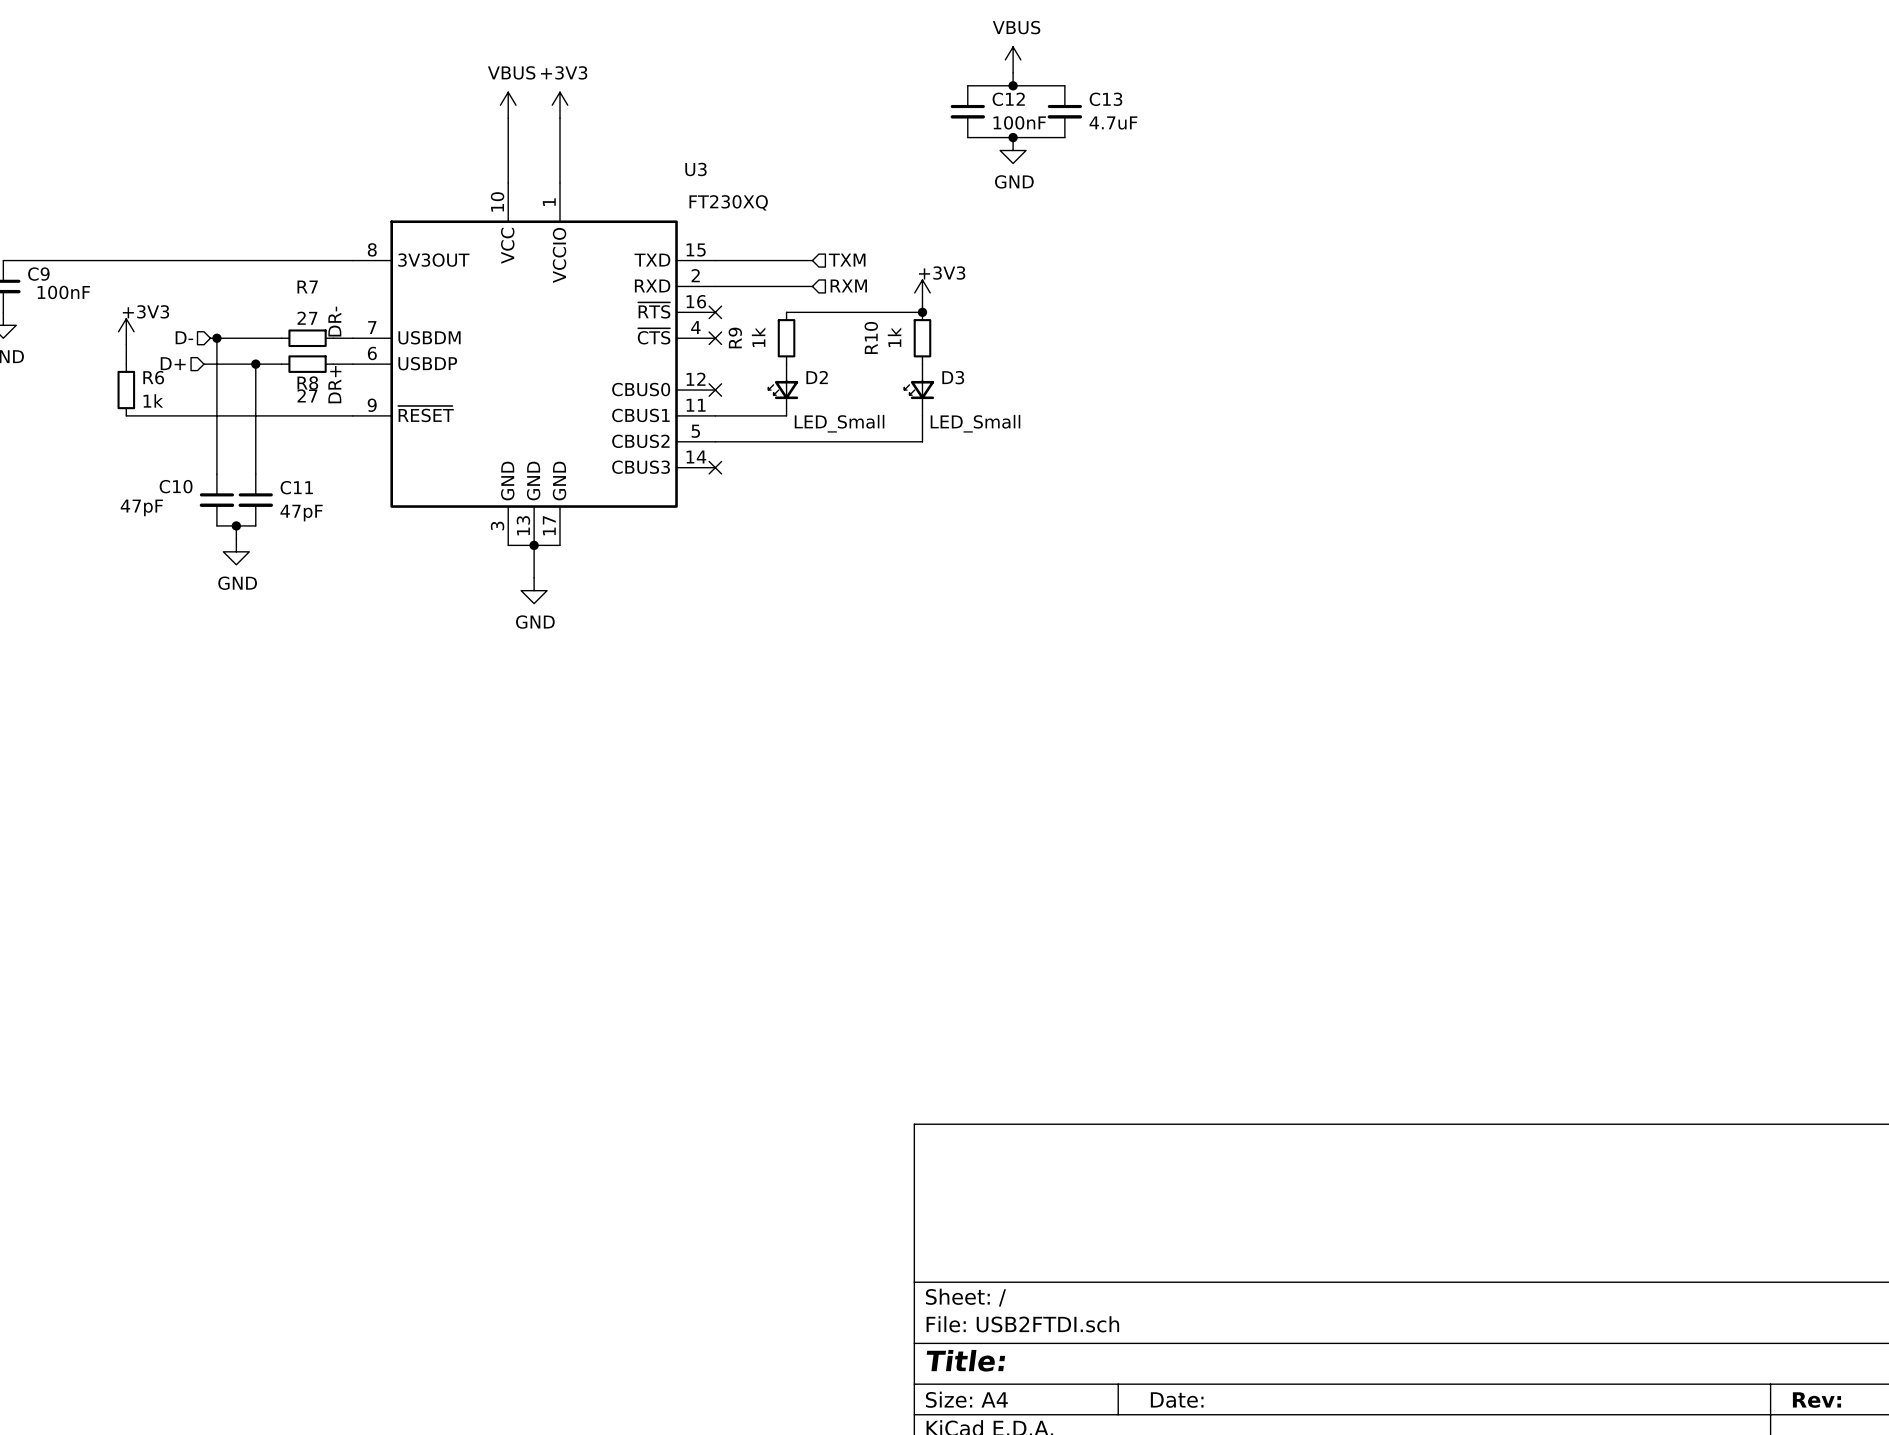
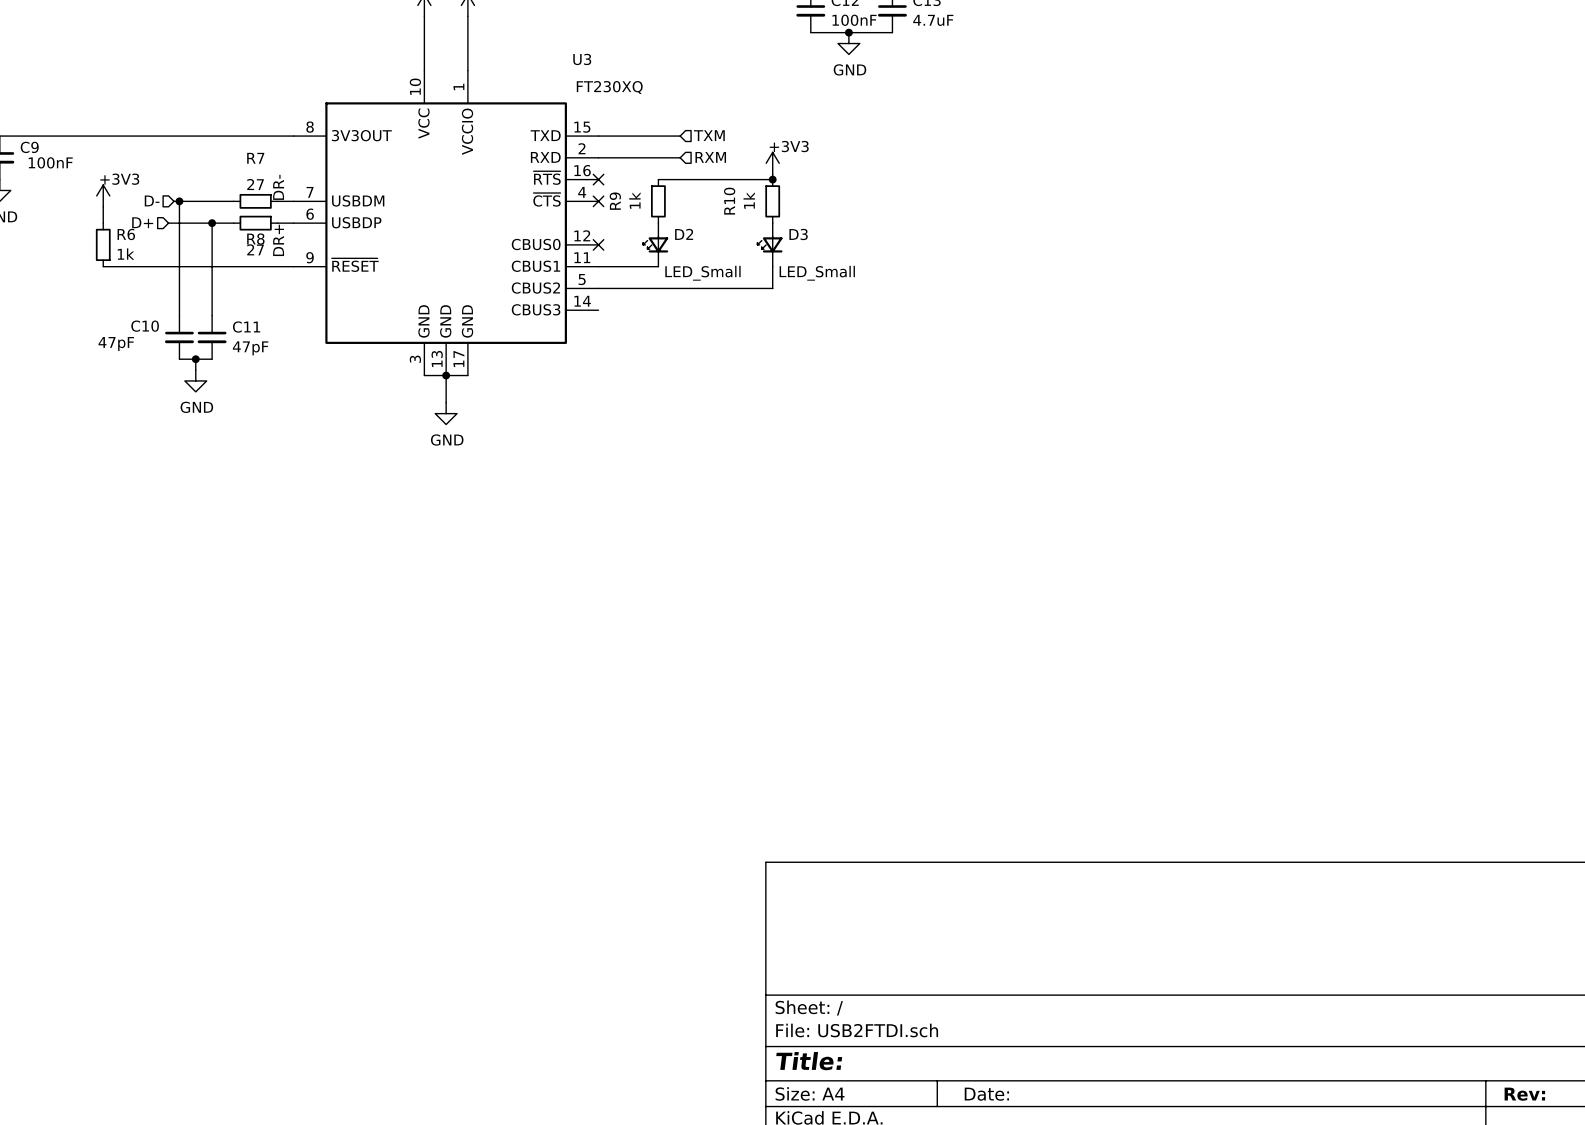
no-connect mark: (715, 467) -> none

